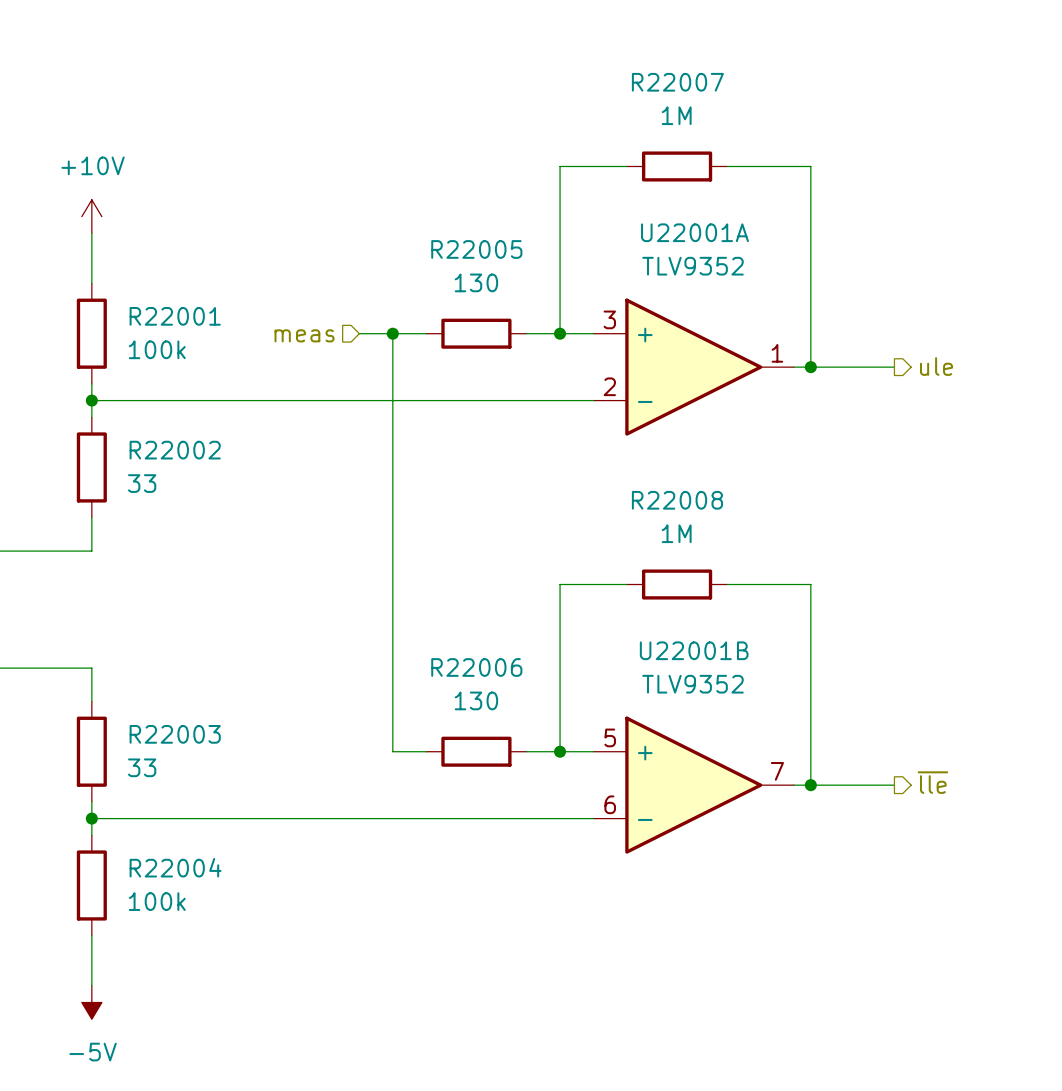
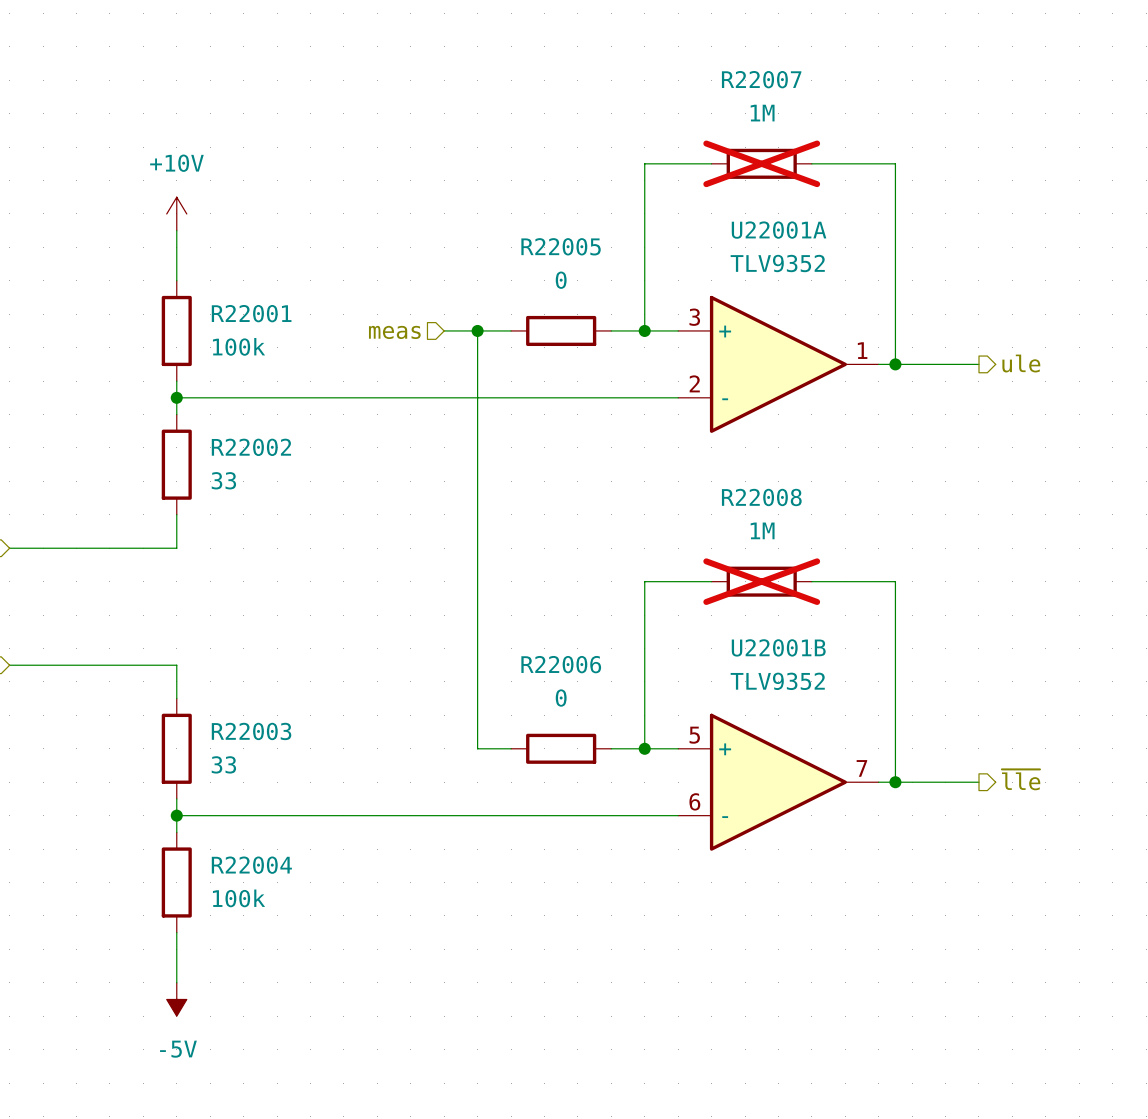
R22007 do-not-place cross: none -> (761, 163)
R22005 value: 130 (476, 282) -> 0 (561, 280)
R22008 do-not-place cross: none -> (761, 581)
R22006 value: 130 (476, 700) -> 0 (561, 698)

